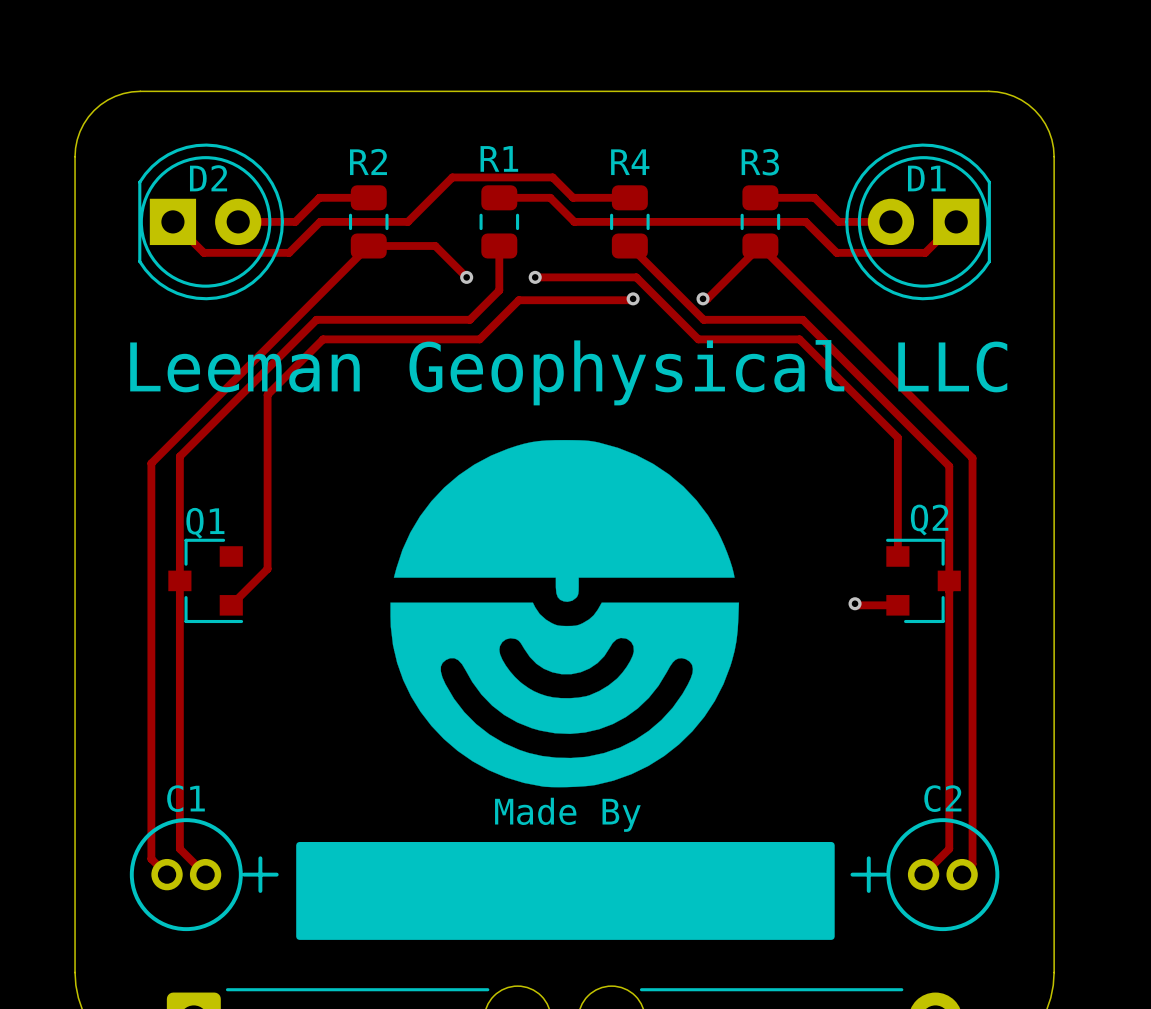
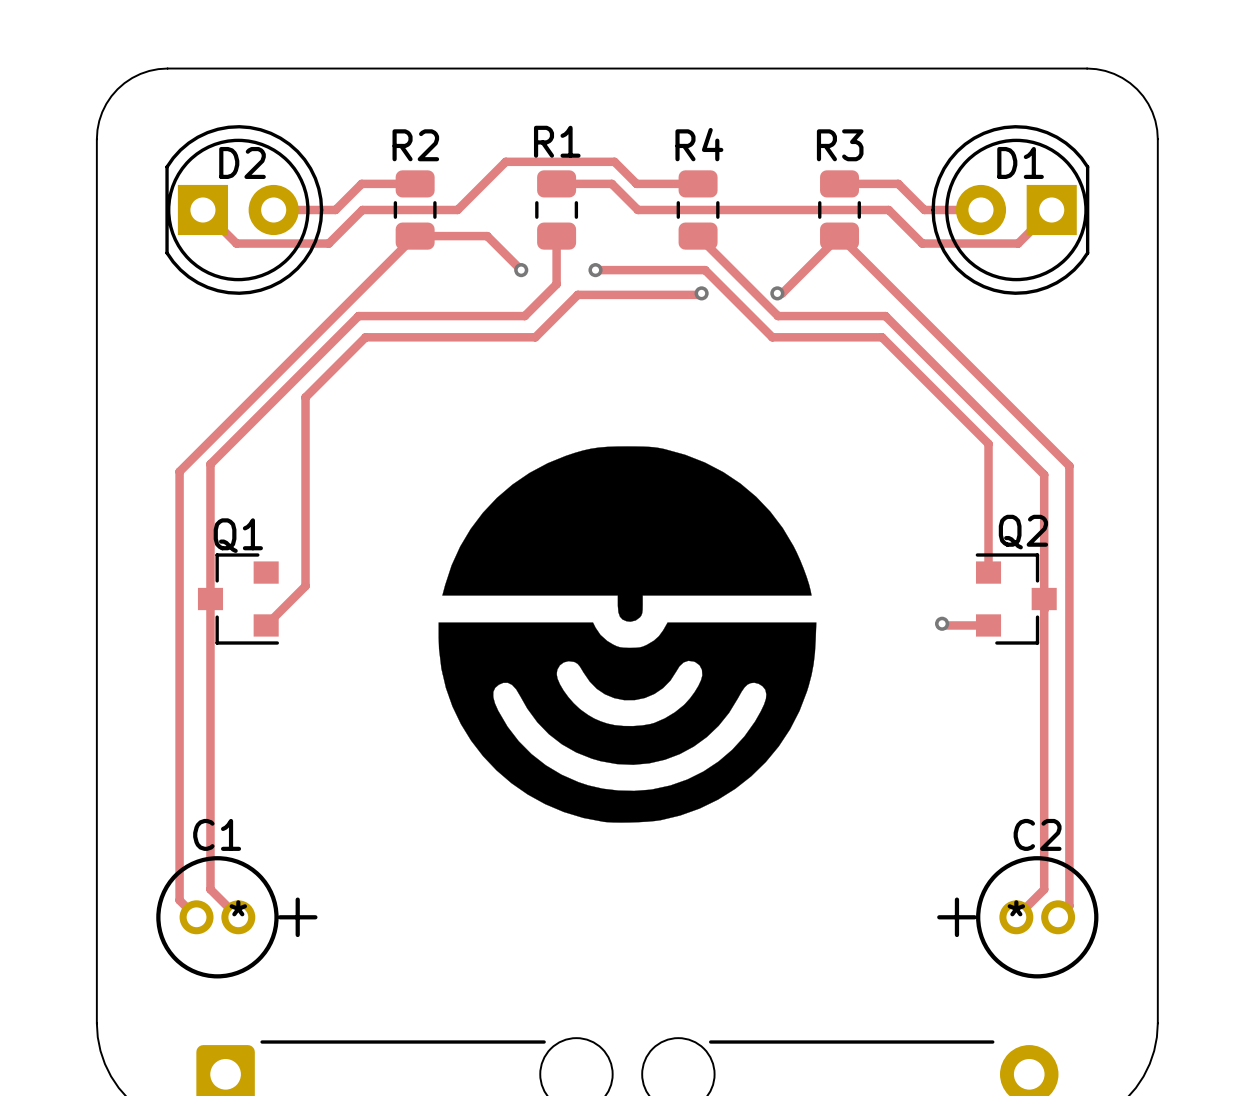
text: Leeman Geophysical LLC (568, 372) -> none
text: Made By (567, 814) -> none
drawing: [296, 841, 835, 940] -> none
C1 text: none -> * (238, 908)
C2 text: none -> * (1016, 908)

